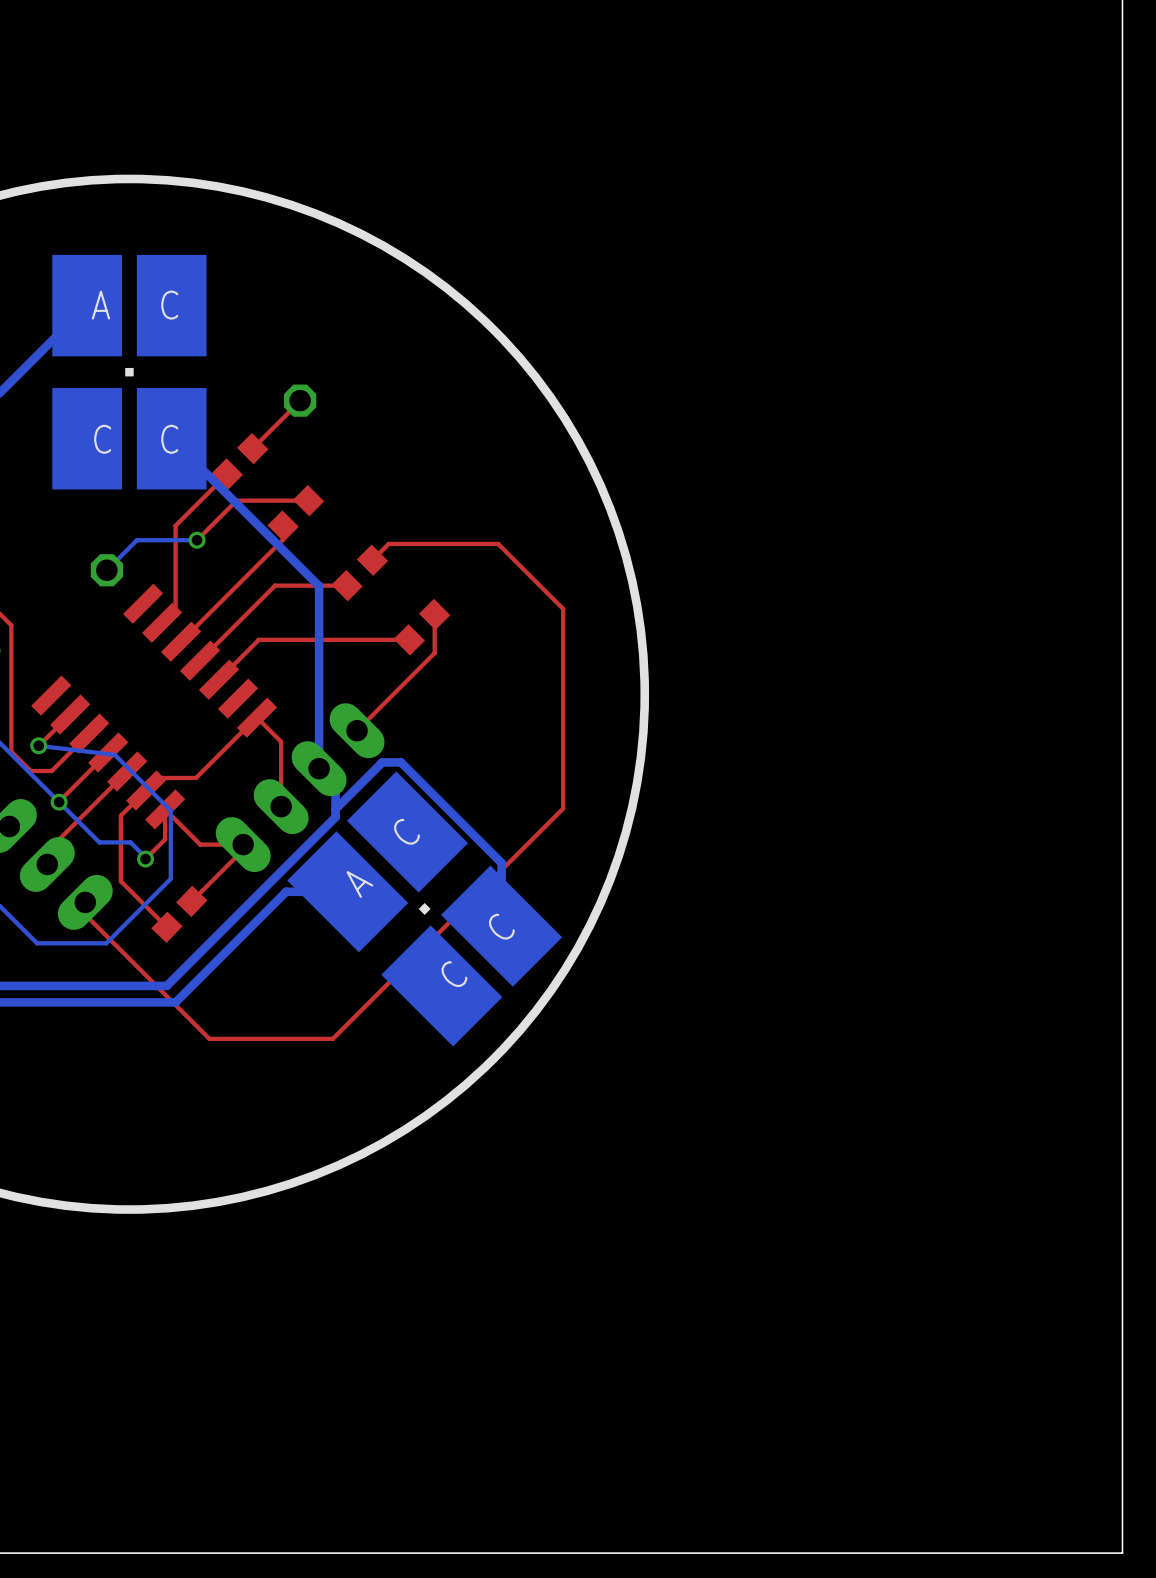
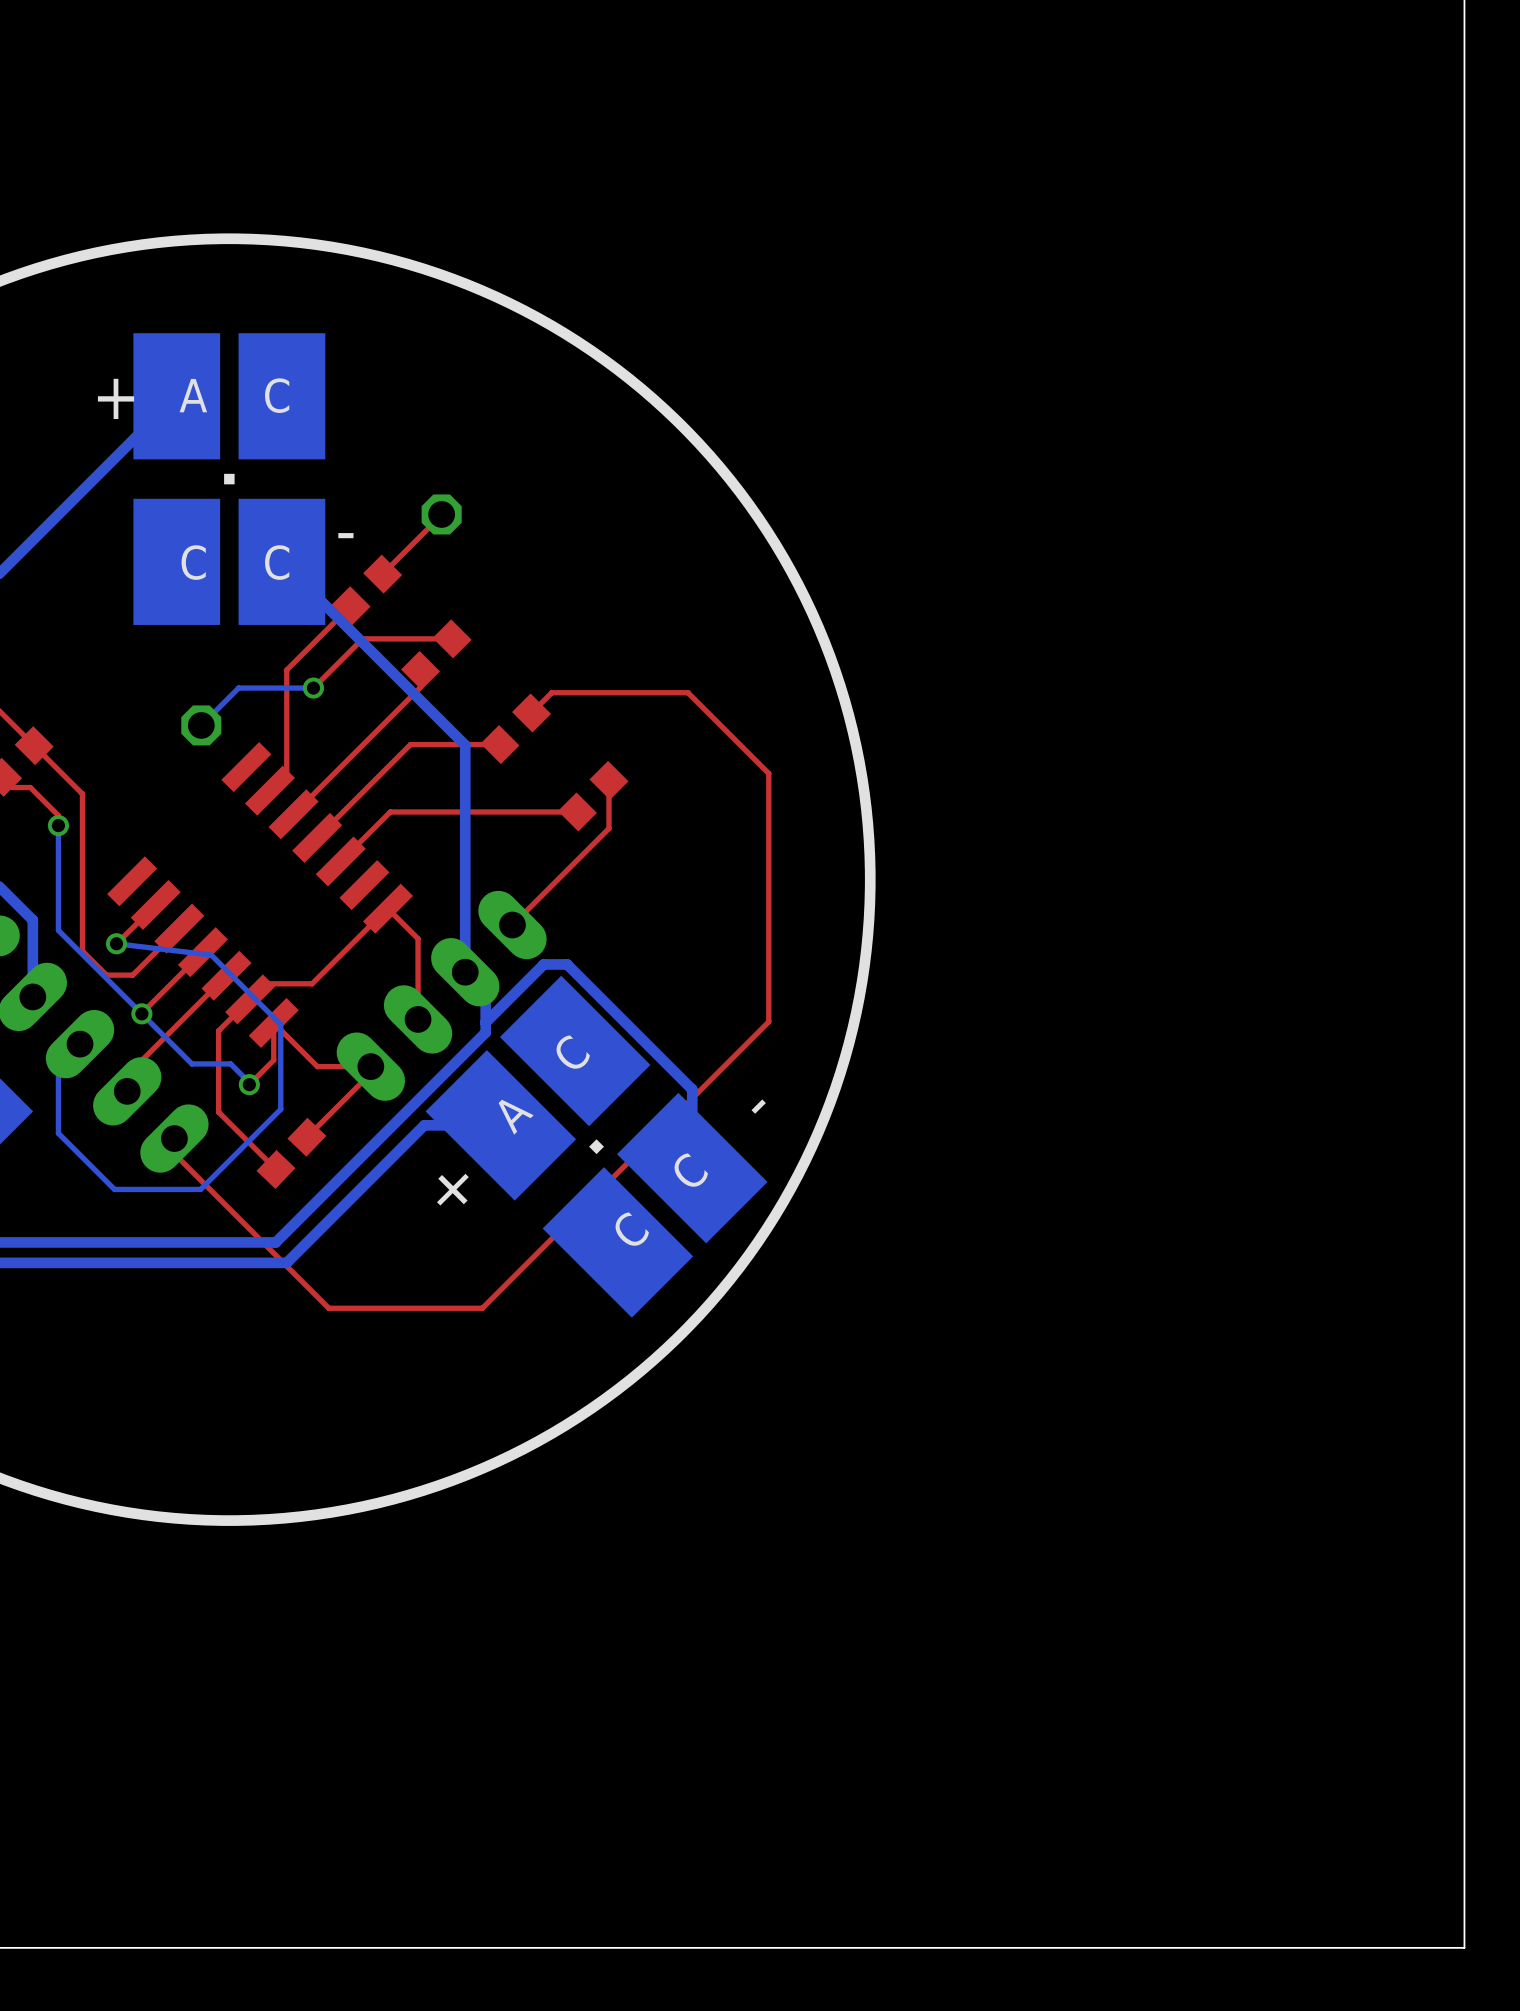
text: none -> + (115, 398)
text: none -> - (345, 535)
text: none -> - (758, 1106)
text: none -> + (452, 1189)

